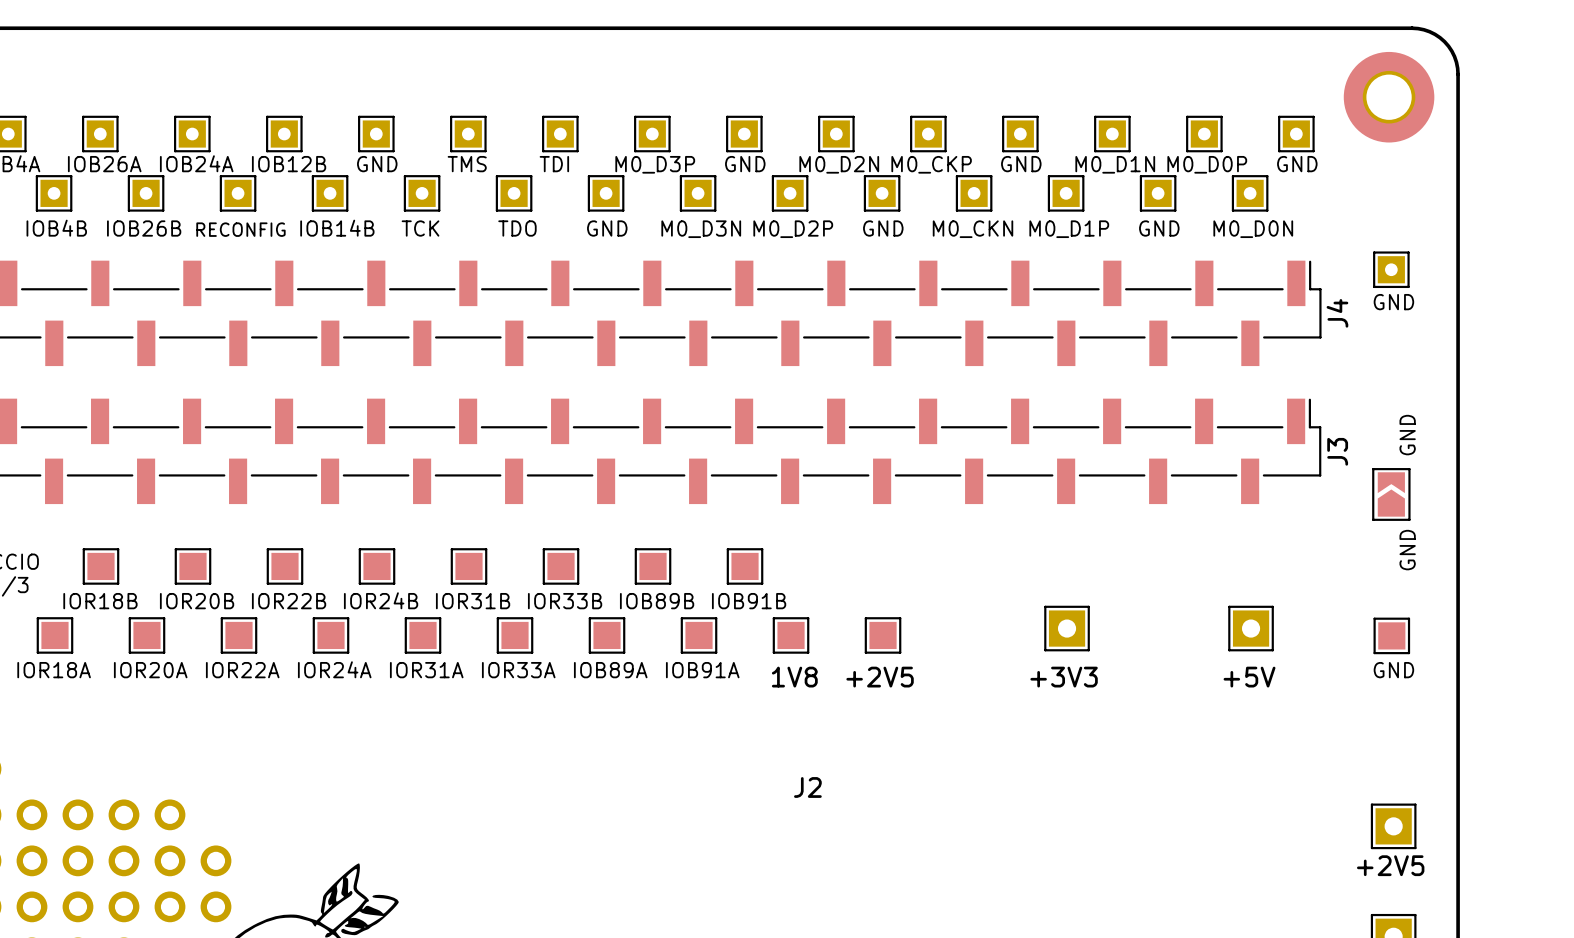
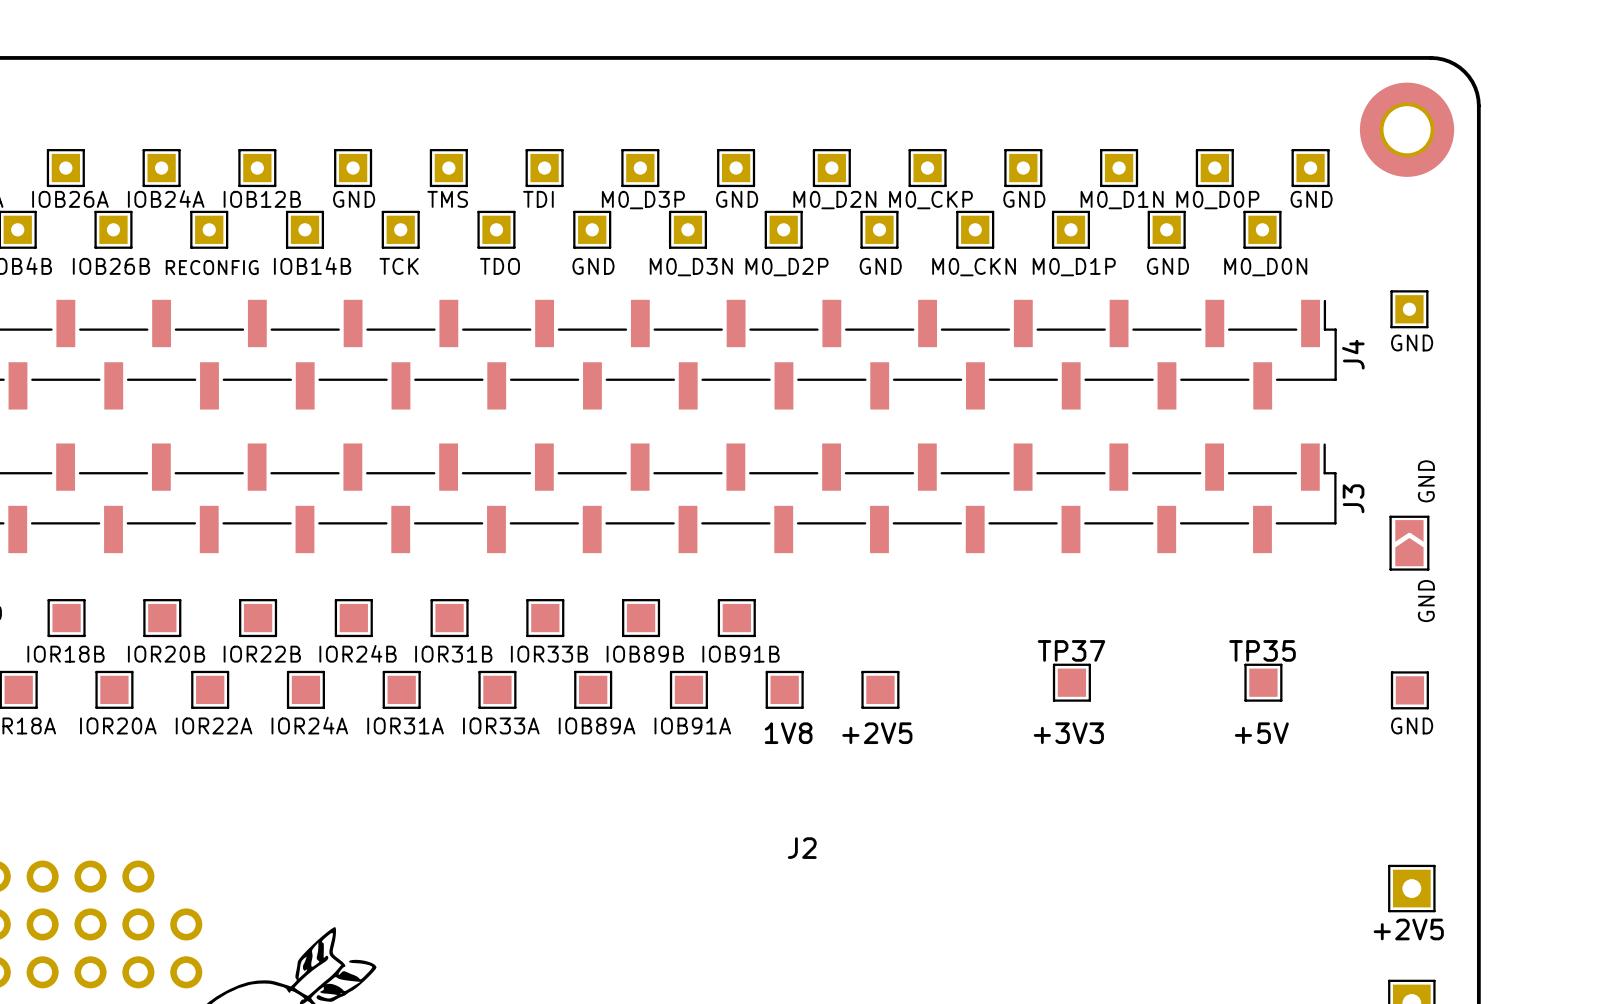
part: (1067, 628) -> none
TP37: none -> (1071, 682)
part: (1251, 628) -> none
TP35: none -> (1263, 682)

